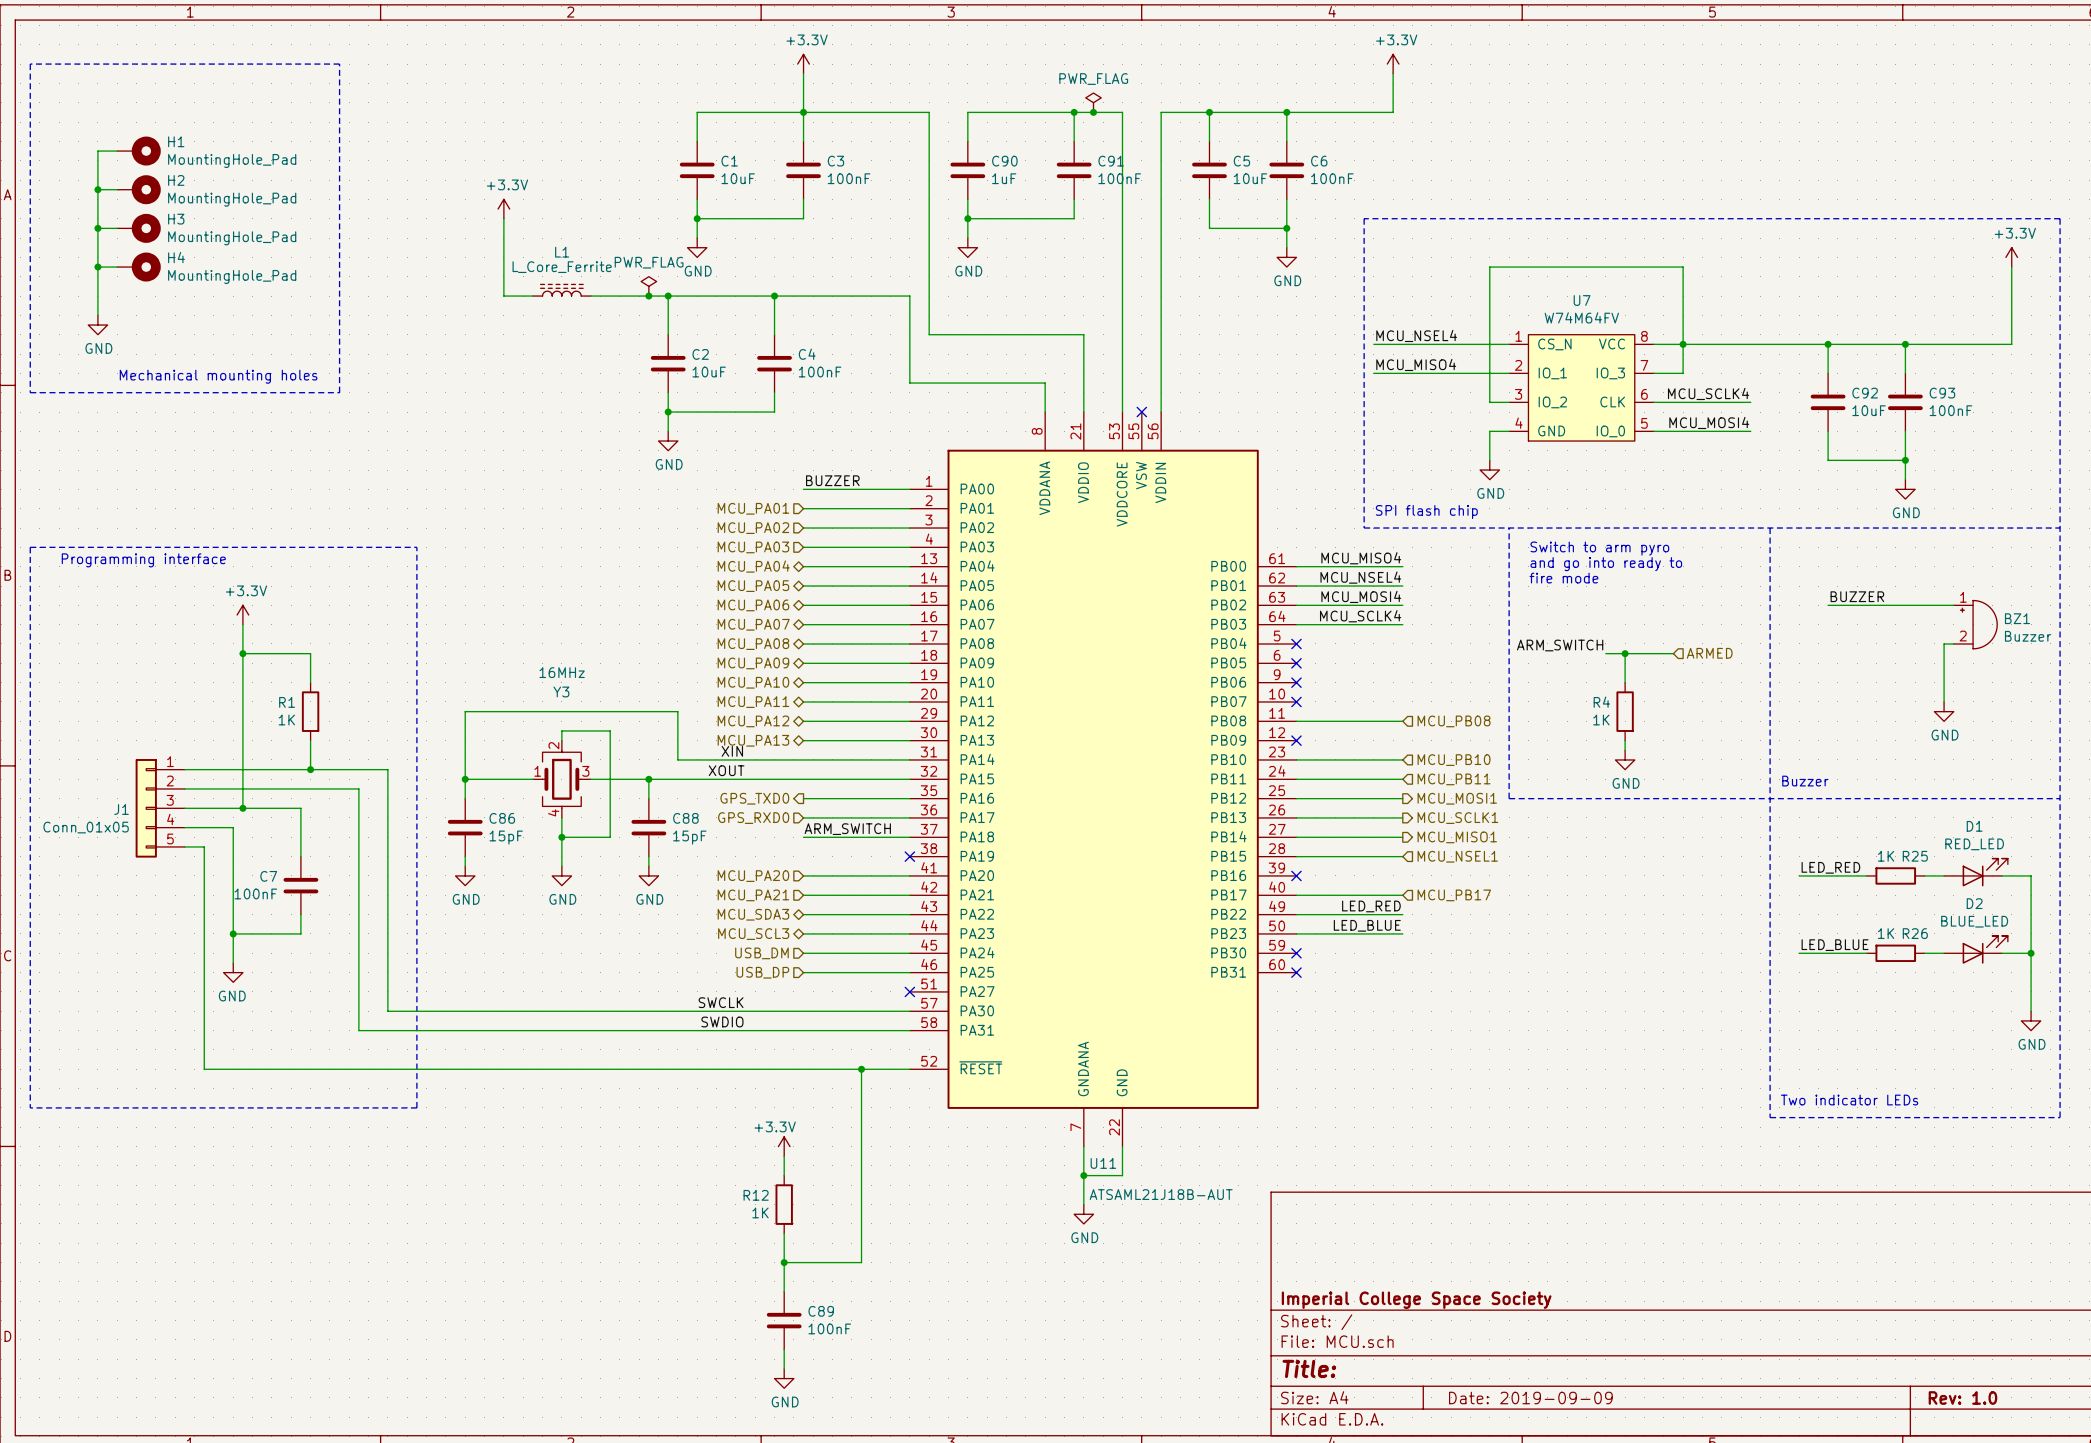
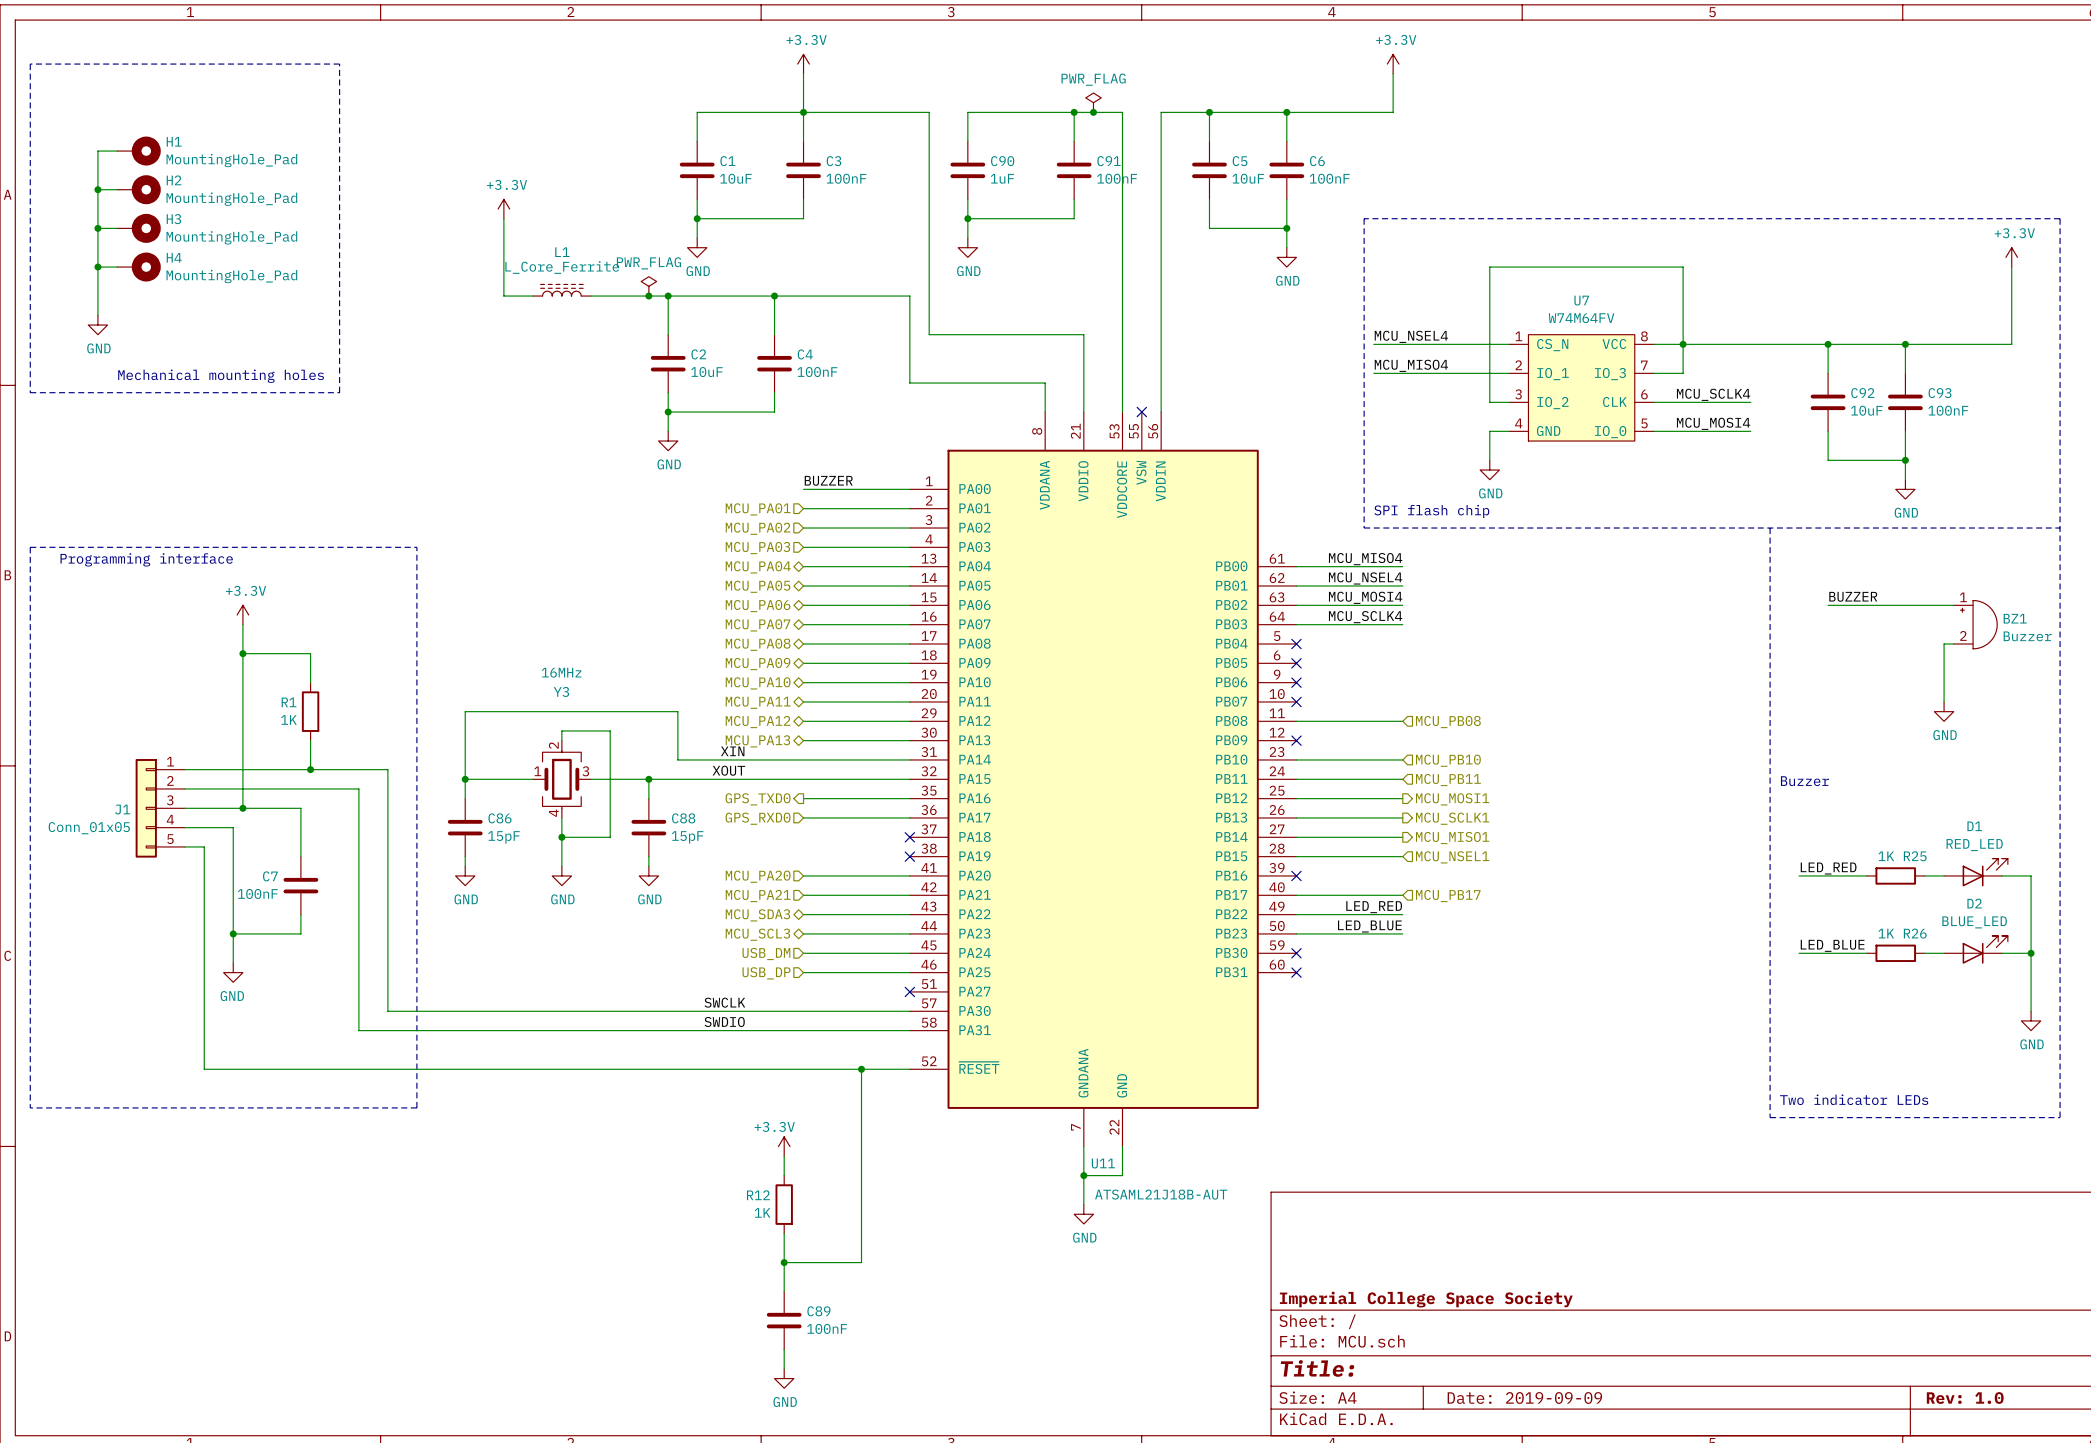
line: (1509, 528) (1509, 798) (2060, 798) -> none
text: Switch to arm pyro (1599, 548) -> none
text: and go into ready to (1606, 564) -> none
text: fire mode (1563, 578) -> none
label: ARM_SWITCH (1560, 645) -> none
wire: (1605, 653) (1673, 653) -> none
wire: (1625, 653) (1625, 682) -> none
junction: (1625, 653) -> none
hierarchical label: ARMED (1709, 653) -> none
R4: 1K (1625, 711) -> none
wire: (1625, 740) (1625, 750) -> none
power symbol: GND (1625, 759) -> none
label: ARM_SWITCH (847, 829) -> none
wire: (803, 837) (909, 837) -> none
no-connect mark: none -> (909, 837)

